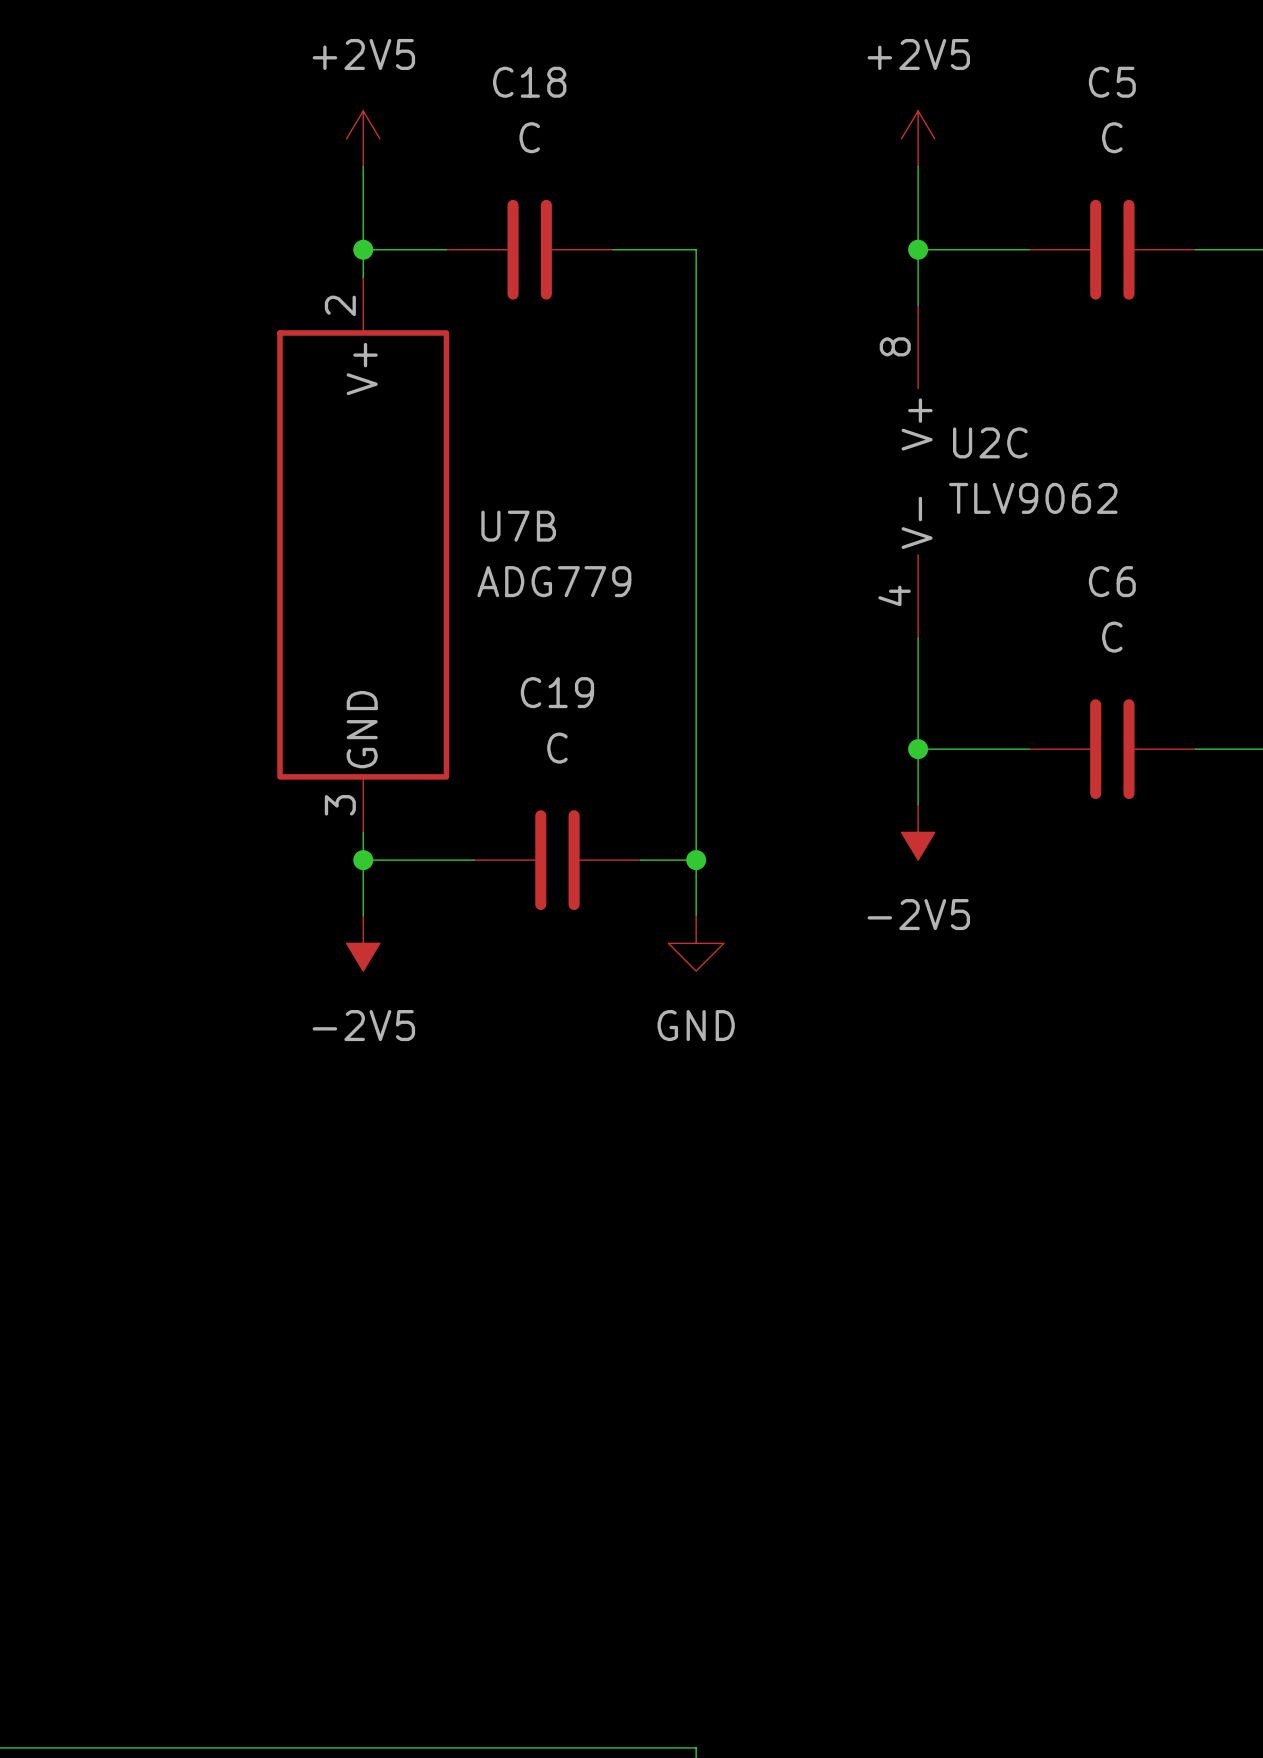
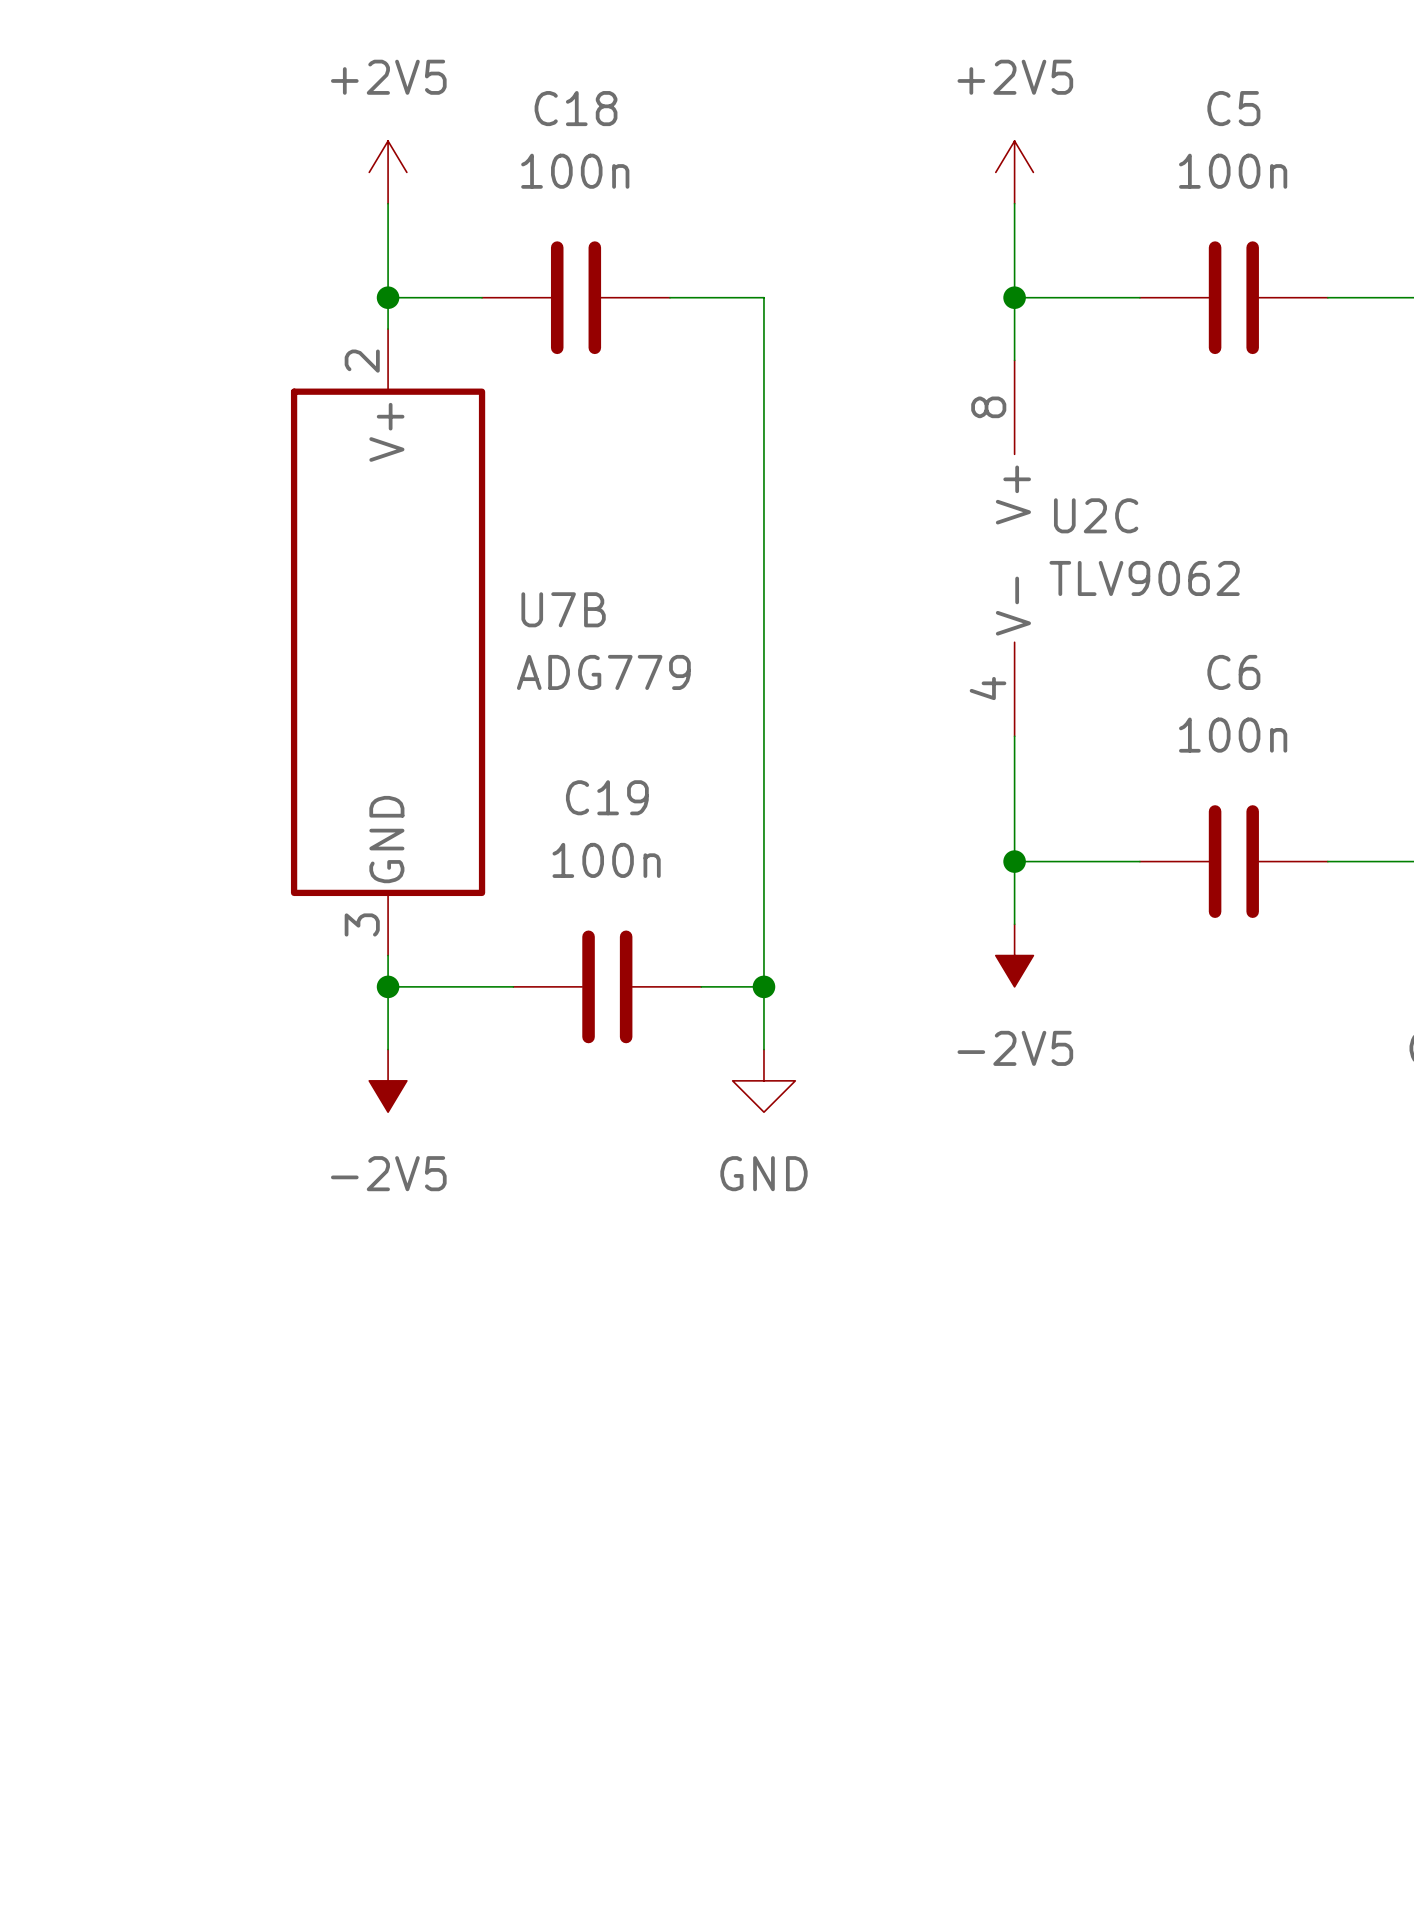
C18 value: C (529, 137) -> 100n (575, 171)
C5 value: C (1112, 137) -> 100n (1233, 171)
C6 value: C (1112, 637) -> 100n (1233, 735)
C19 value: C (557, 748) -> 100n (606, 860)

